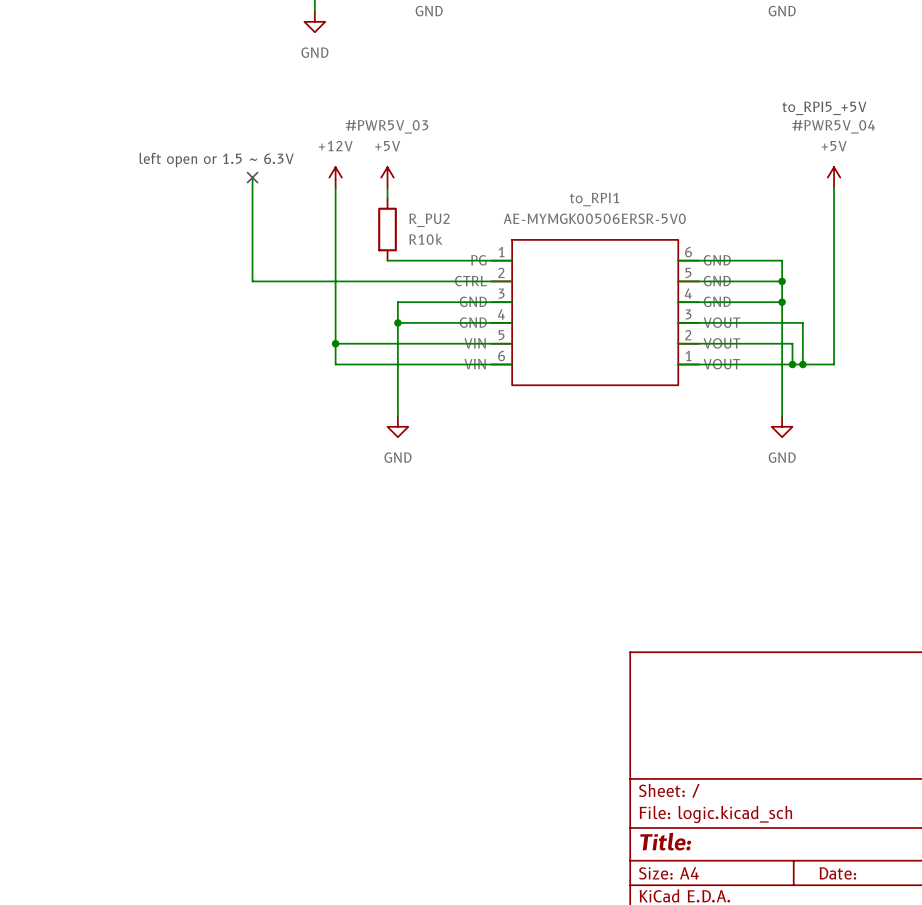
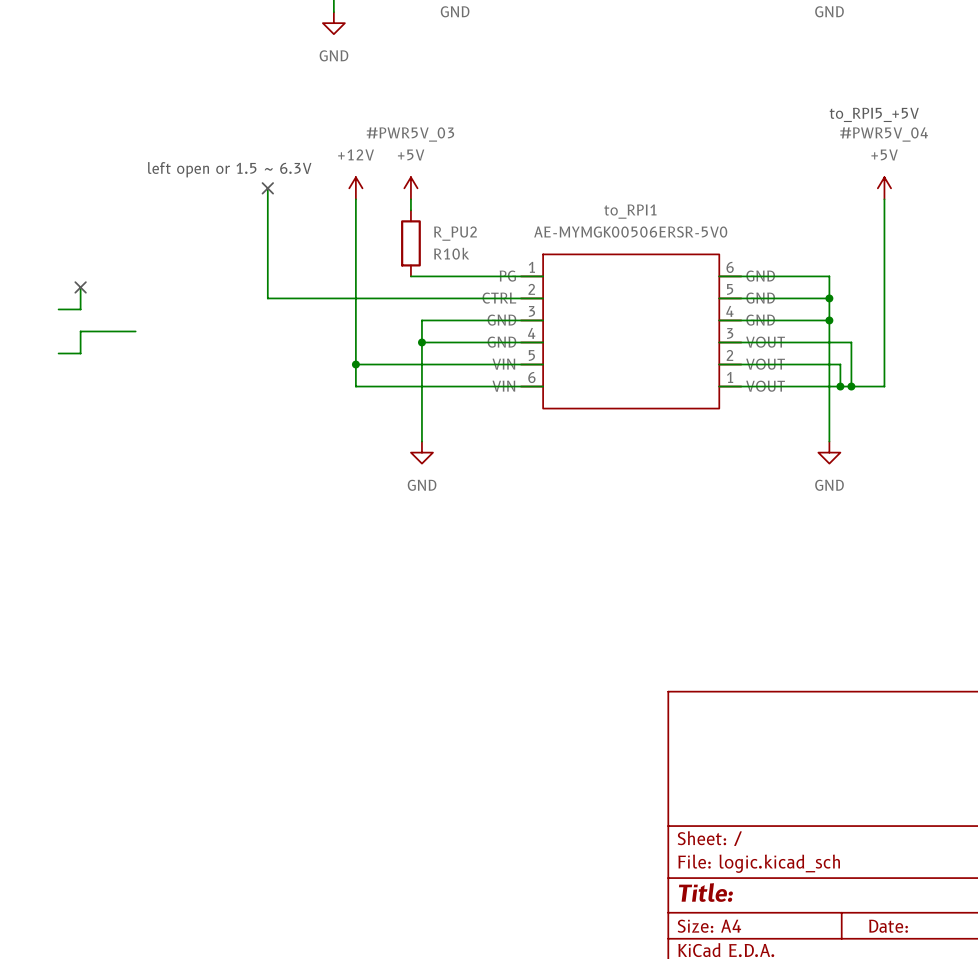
wire: none -> (80, 287) (80, 309) (58, 309)
no-connect mark: none -> (80, 287)
wire: none -> (135, 331) (80, 331) (80, 353) (58, 353)

